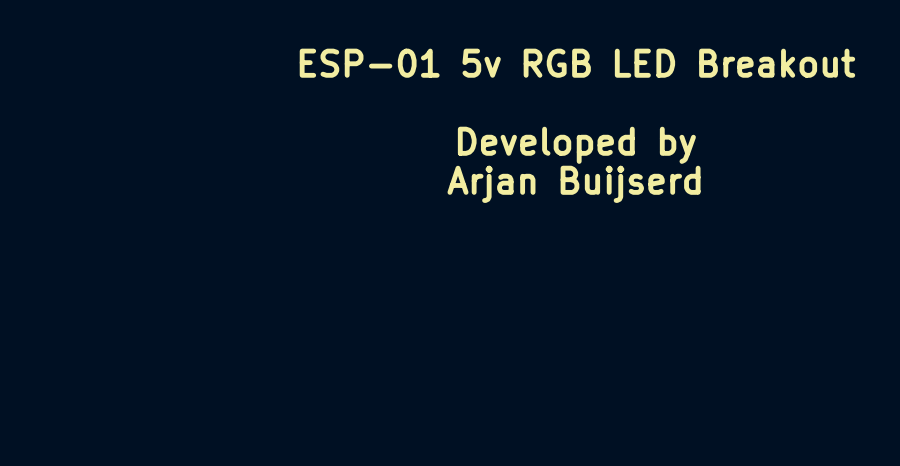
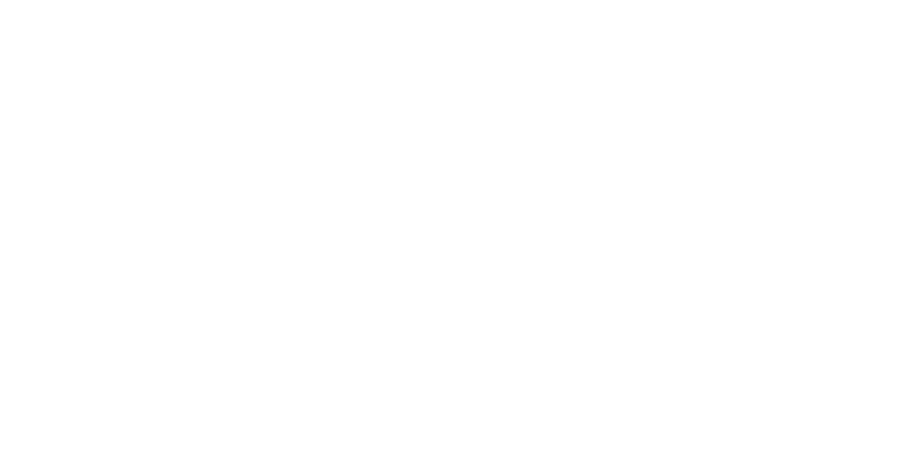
text: ESP-01 5v RGB LED Breakout (577, 63) -> none
text: Developed by (576, 145) -> none
text: Arjan Buijserd (574, 184) -> none

